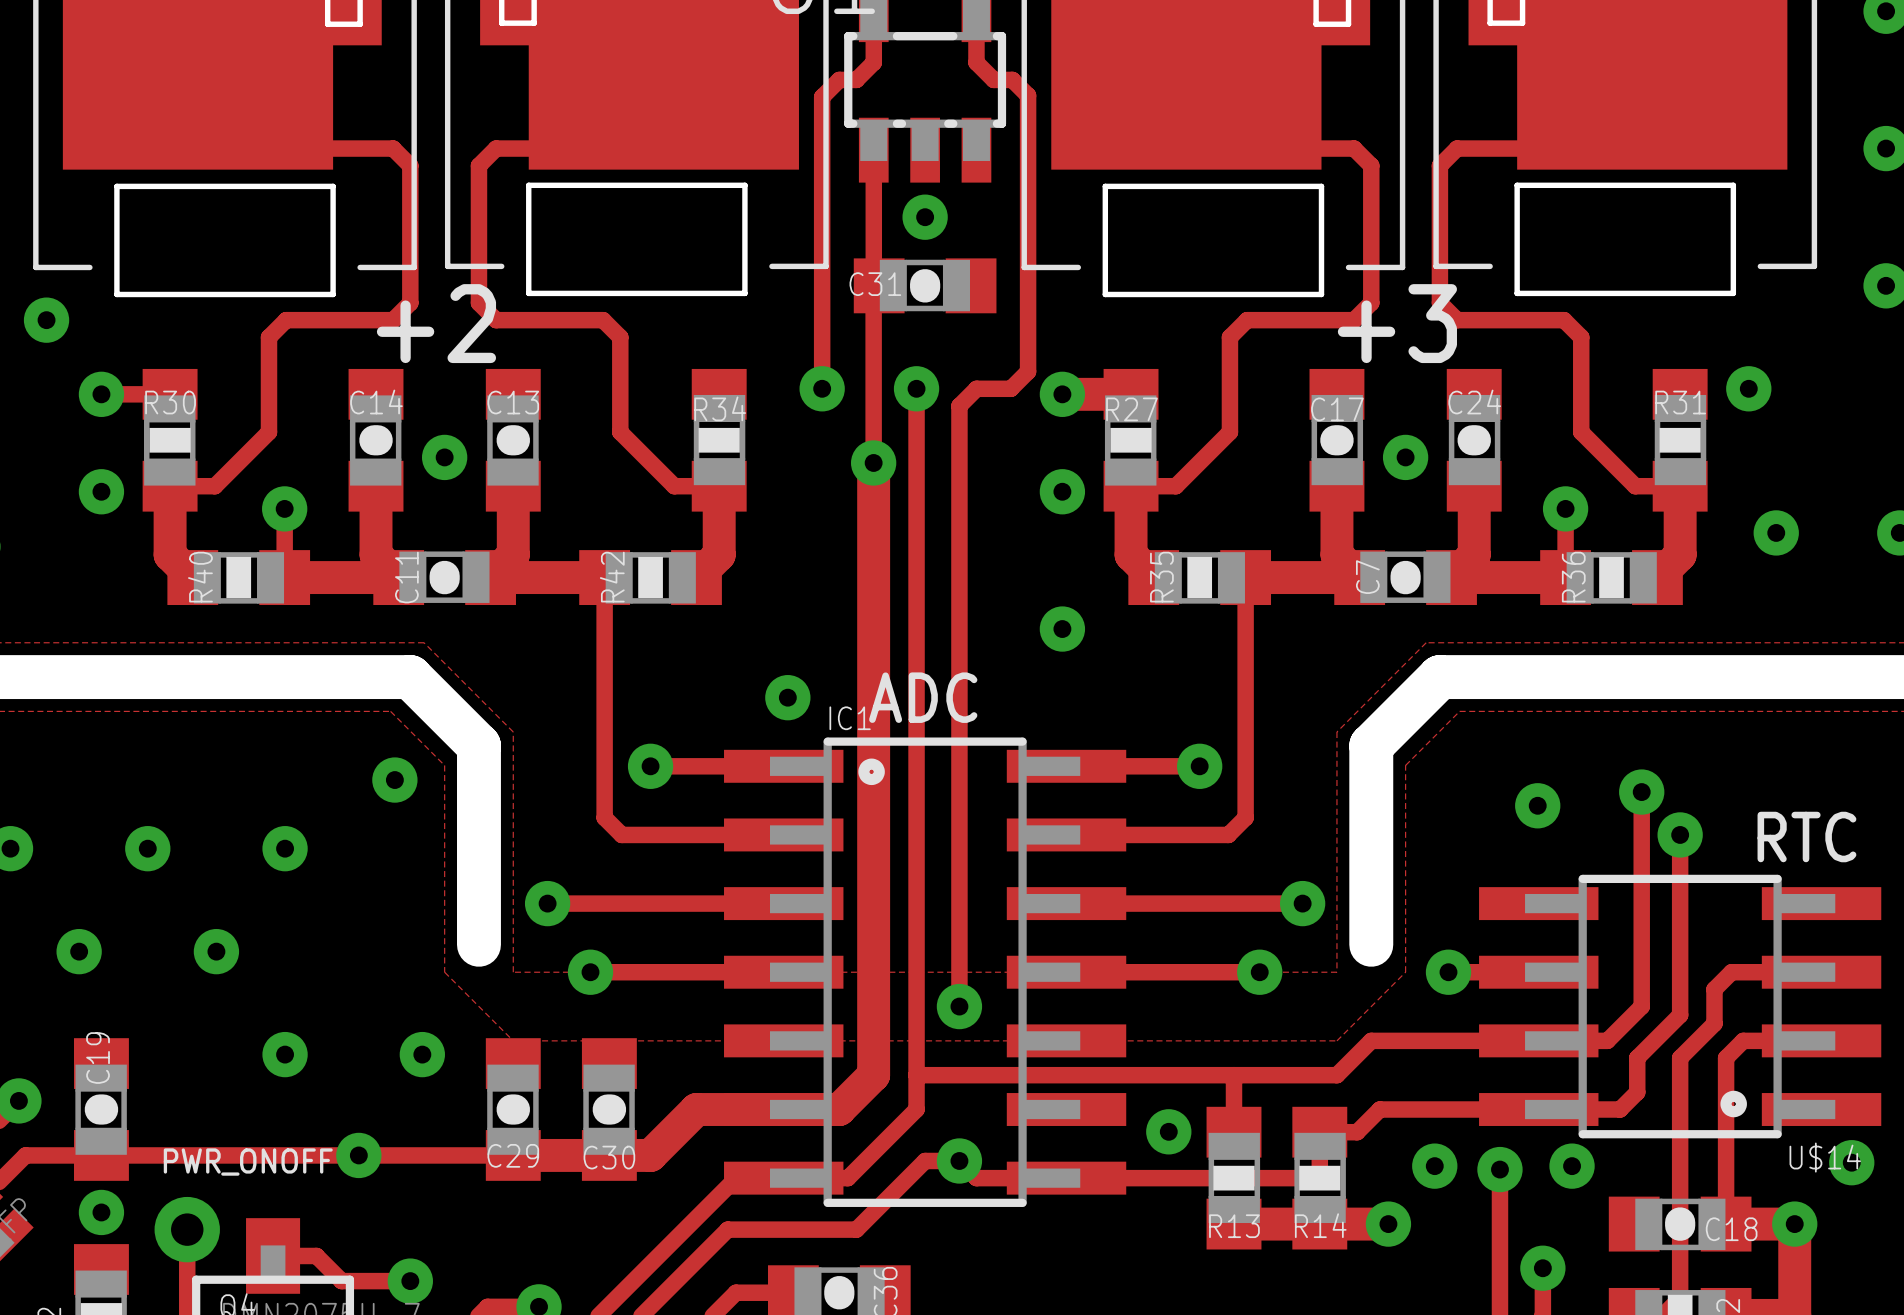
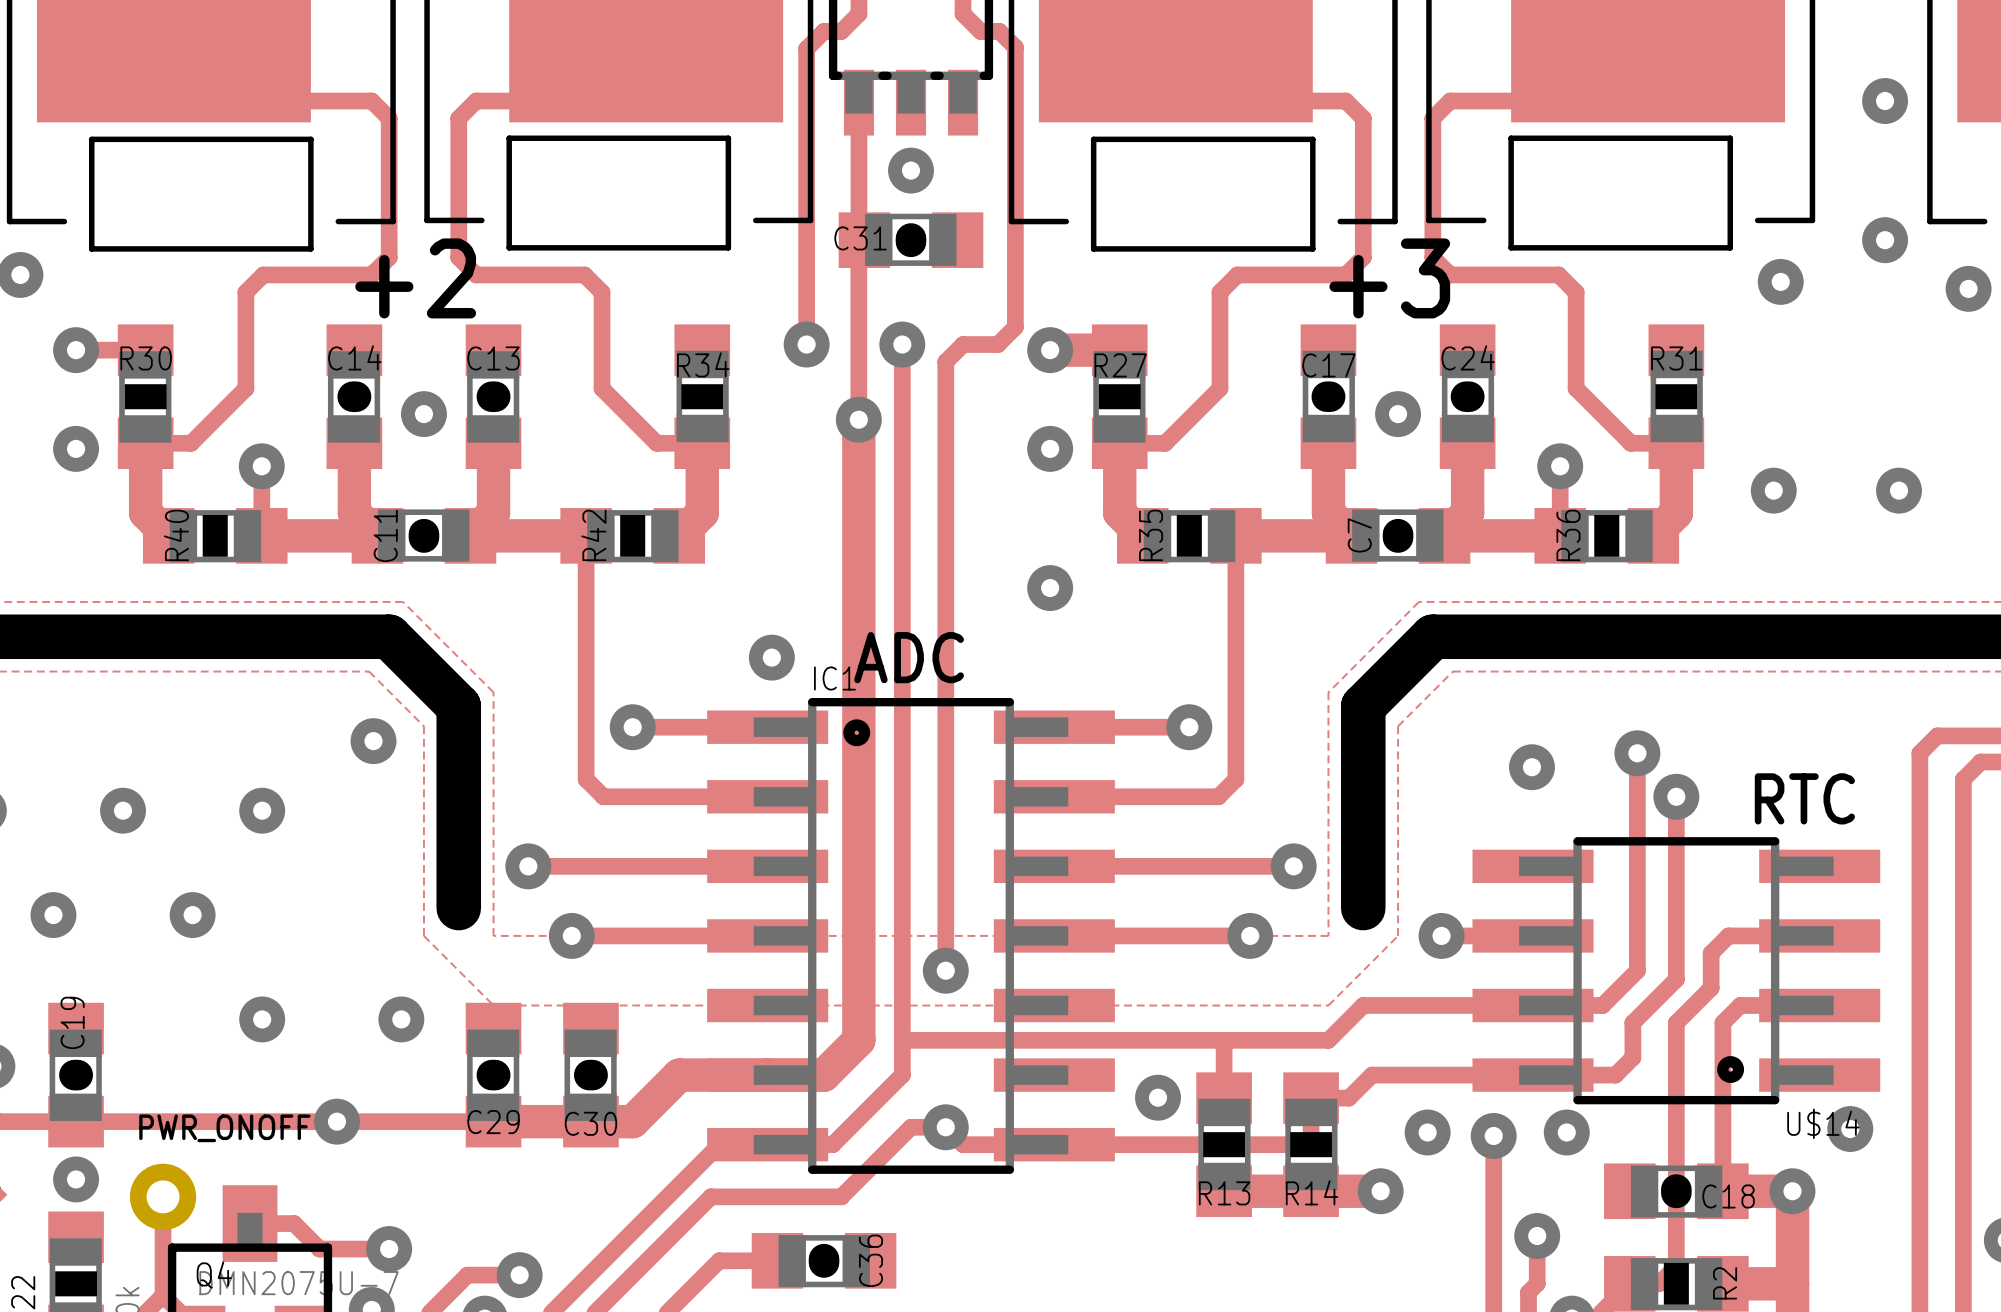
via position: (1748, 388) -> (1780, 281)

